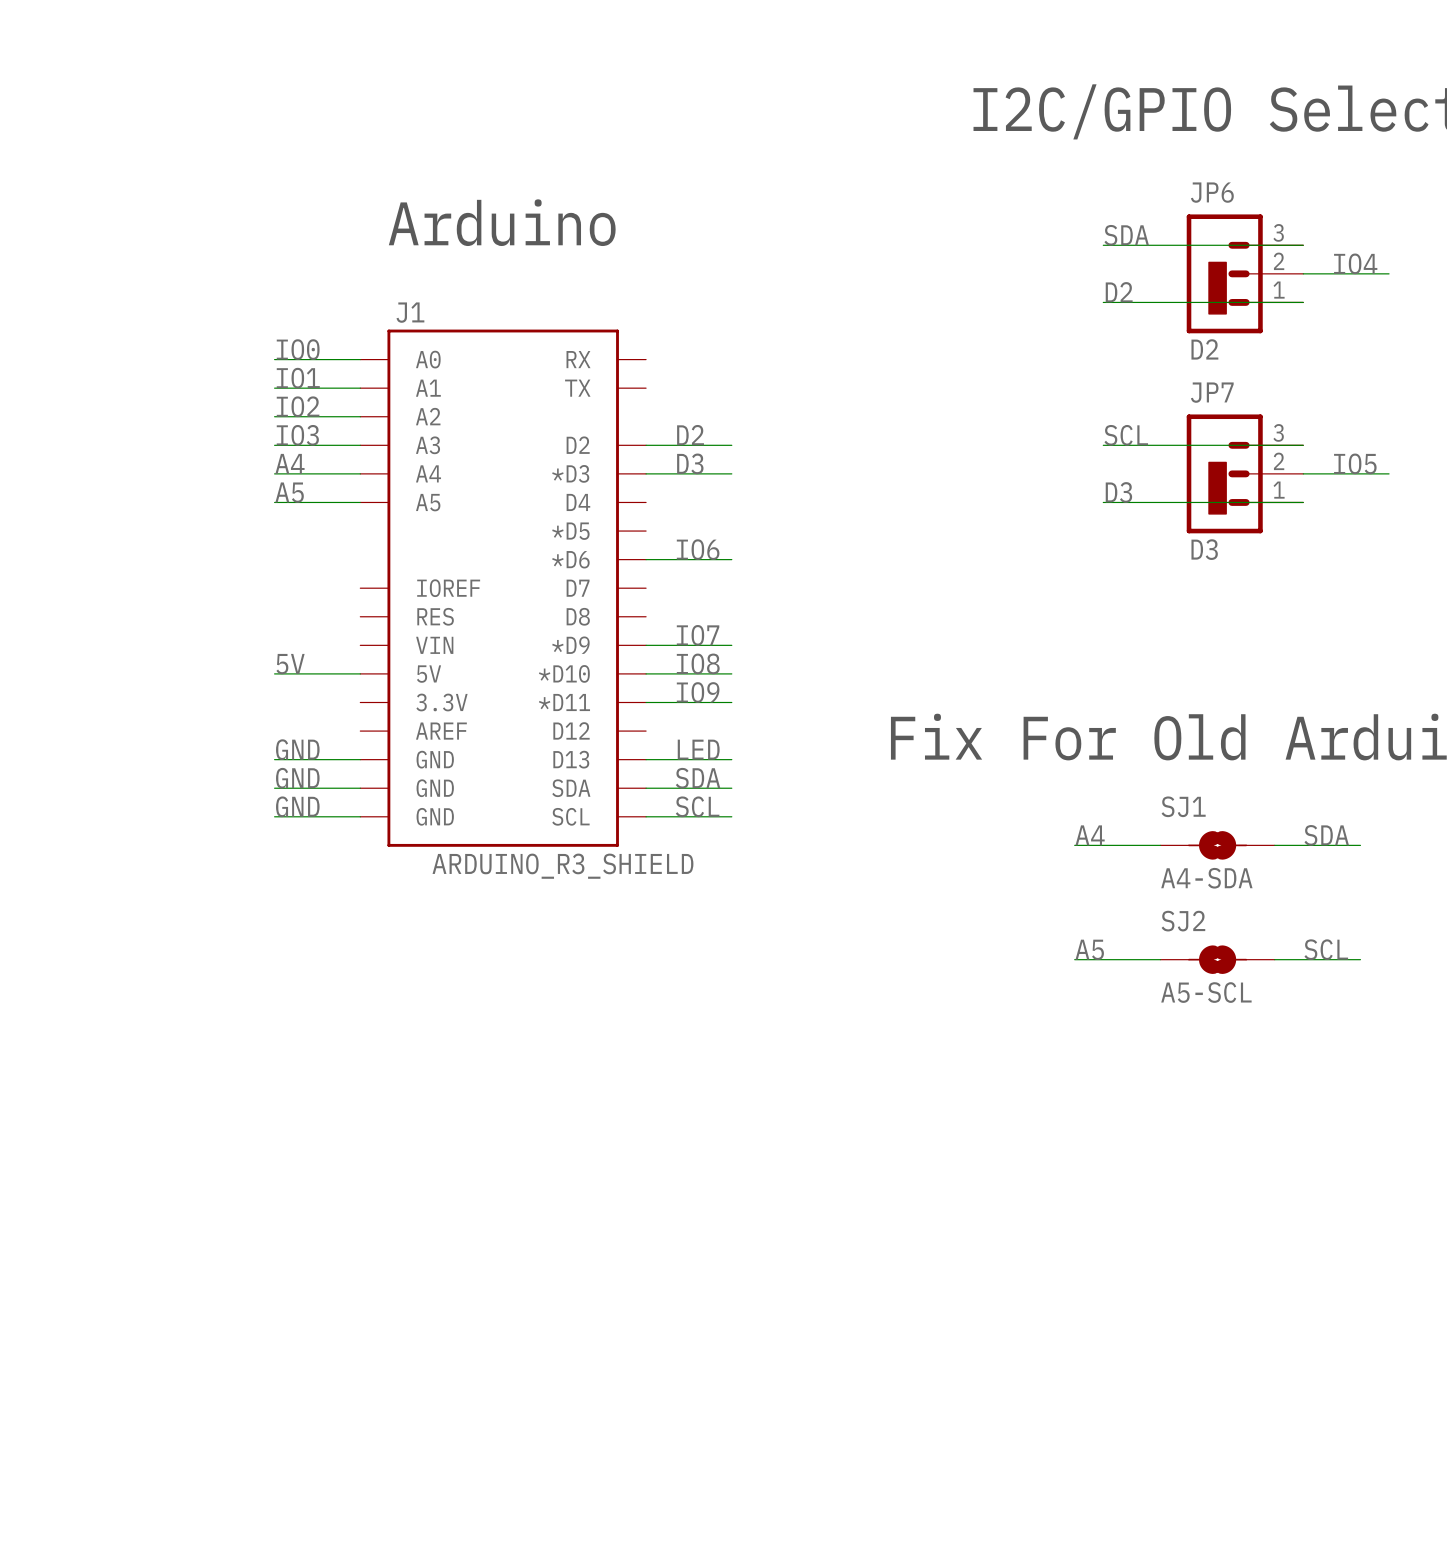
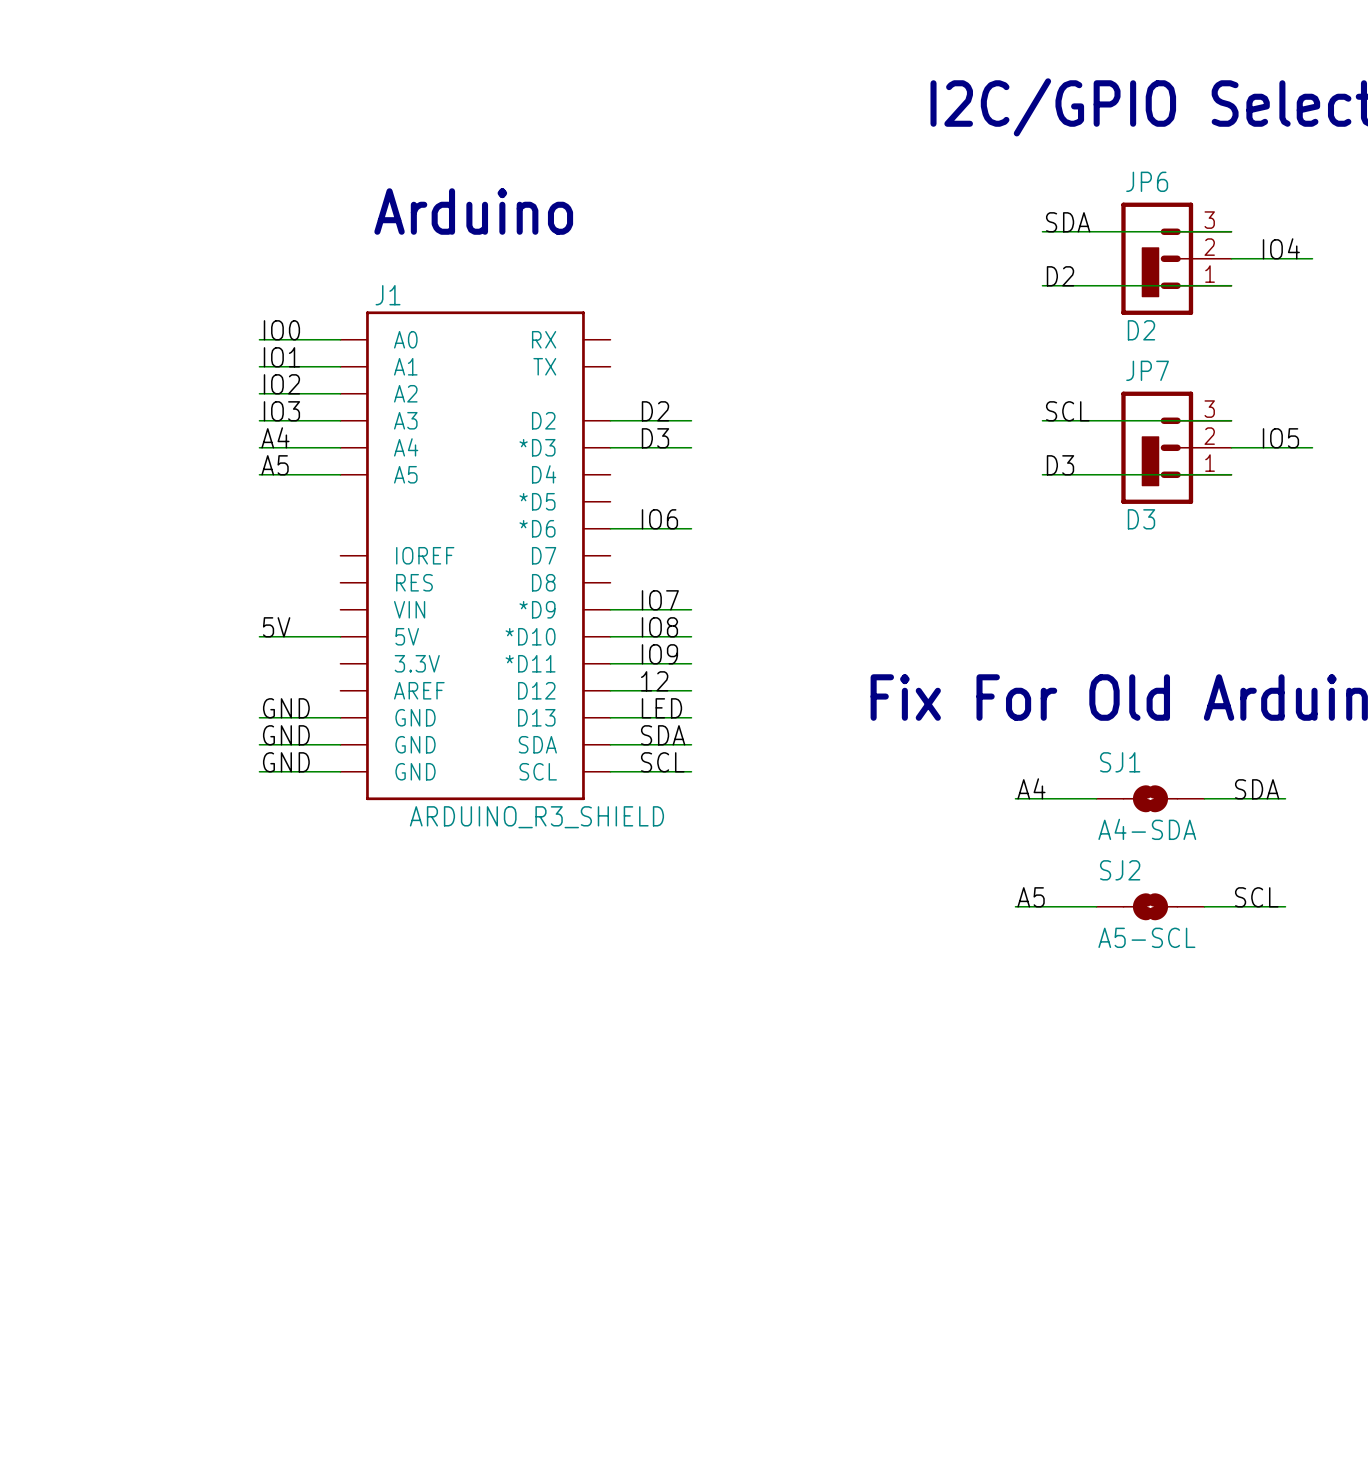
label: none -> 12 (654, 681)
wire: none -> (610, 690) (691, 690)

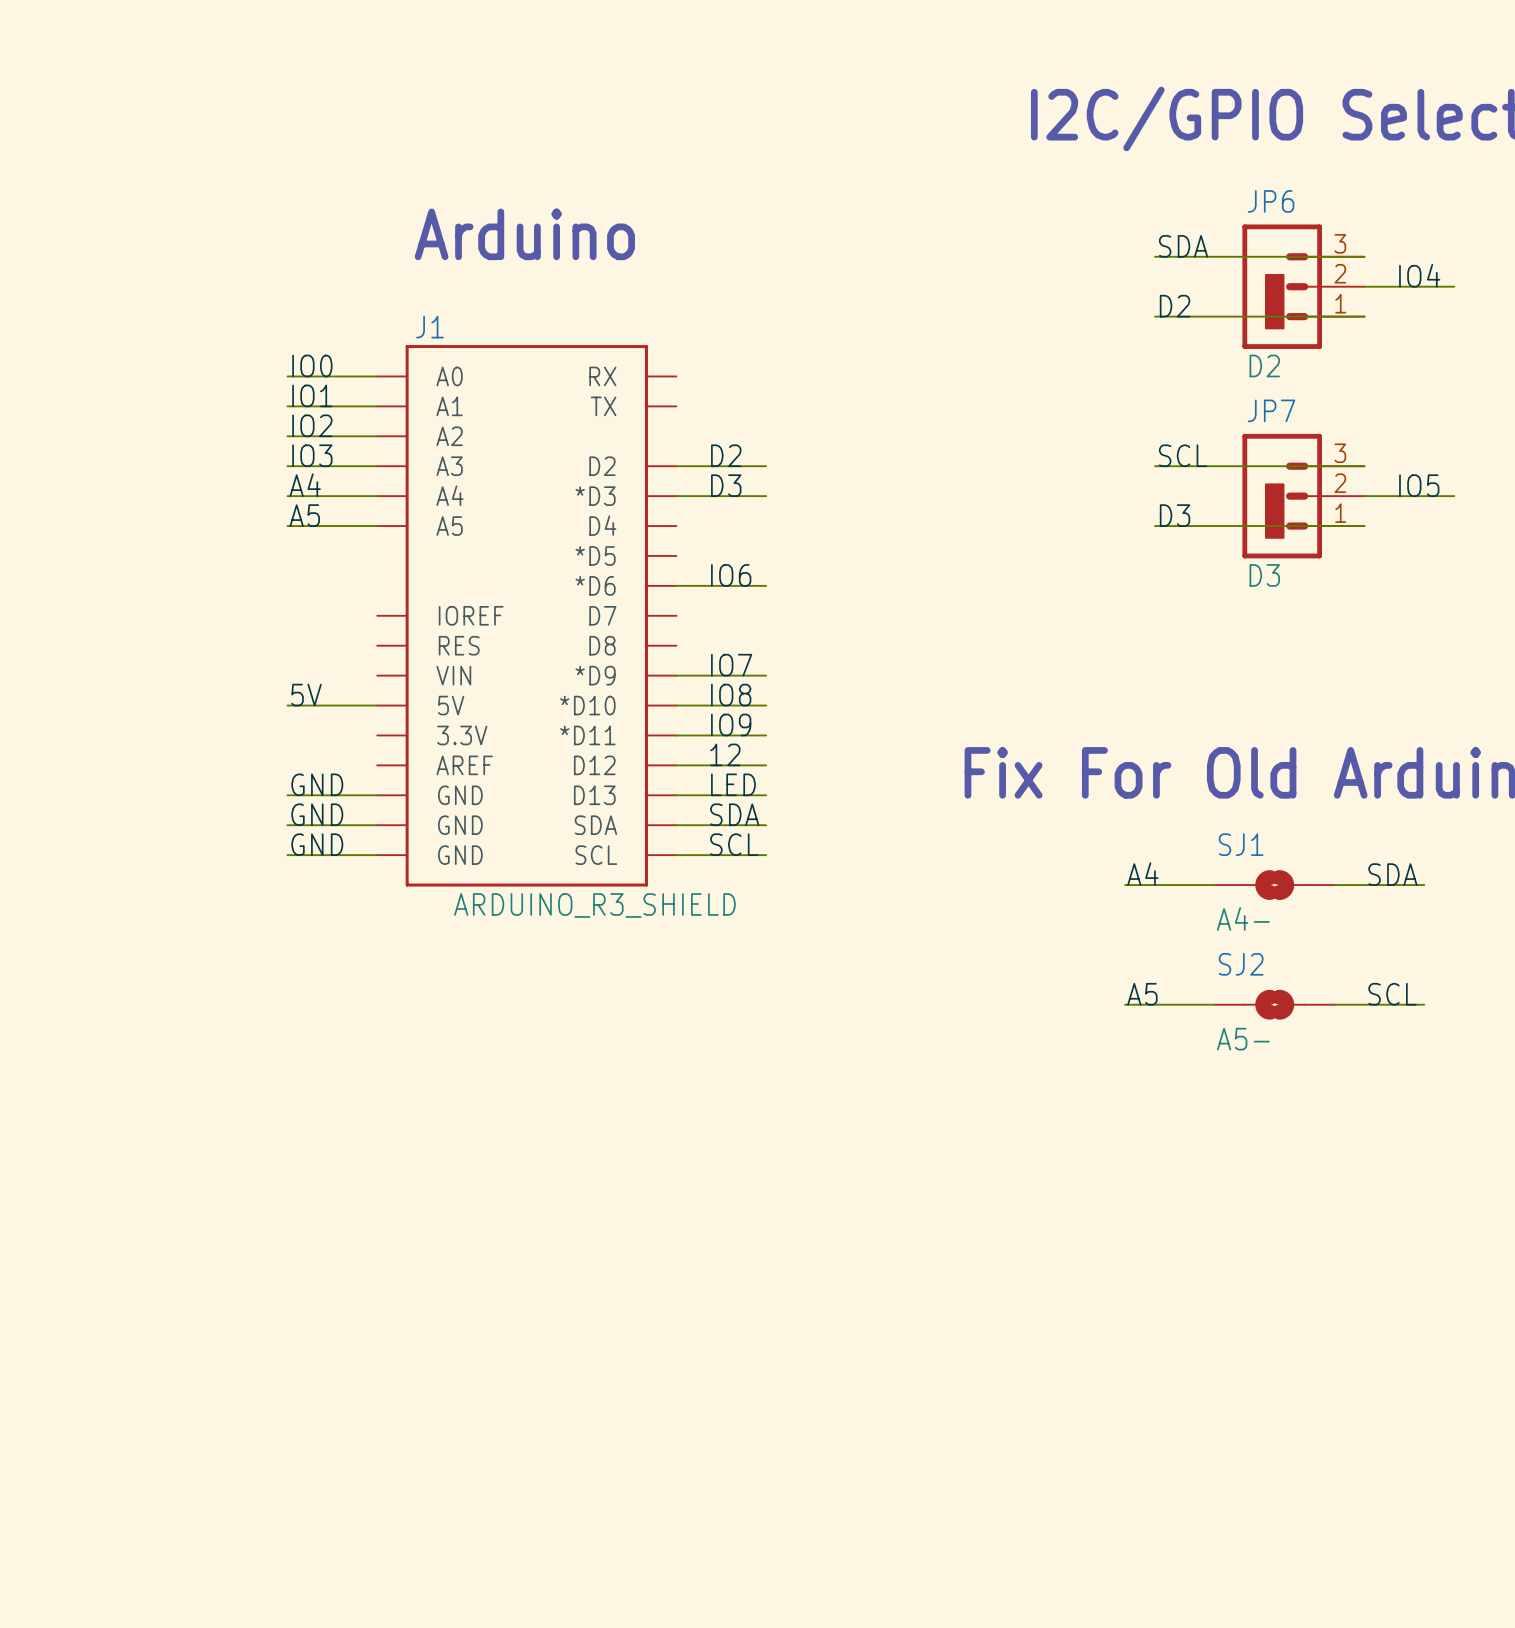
SJ1 value: A4-SDA (1147, 829) -> A4- (1243, 918)
SJ2 value: A5-SCL (1146, 937) -> A5- (1243, 1039)

